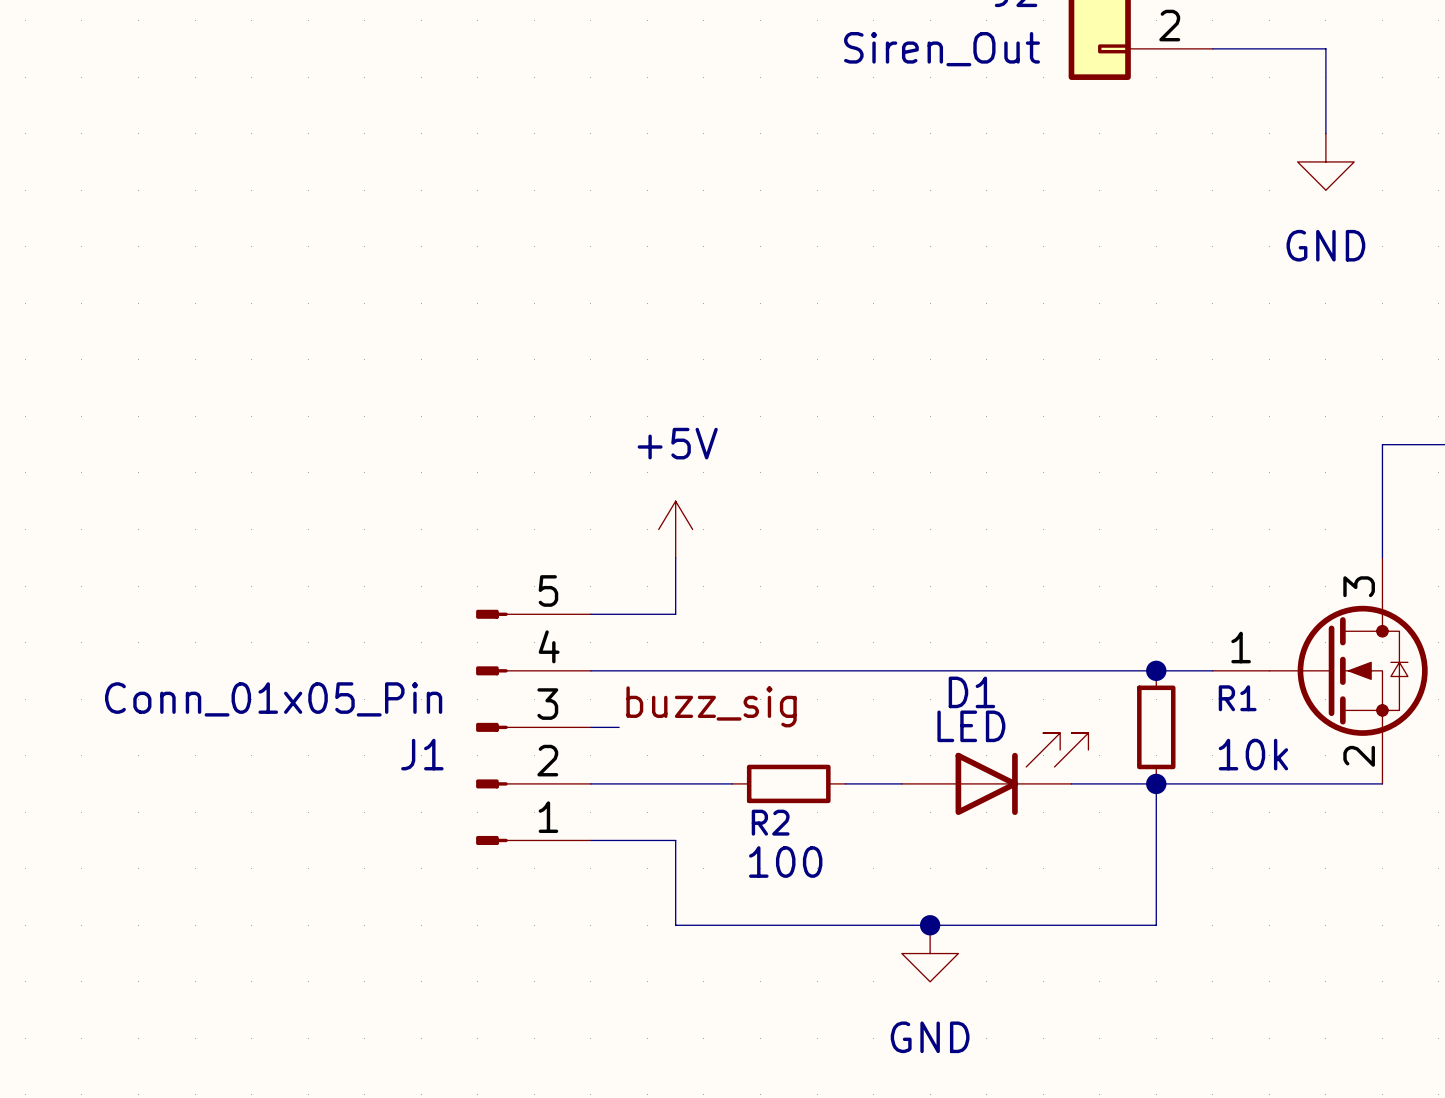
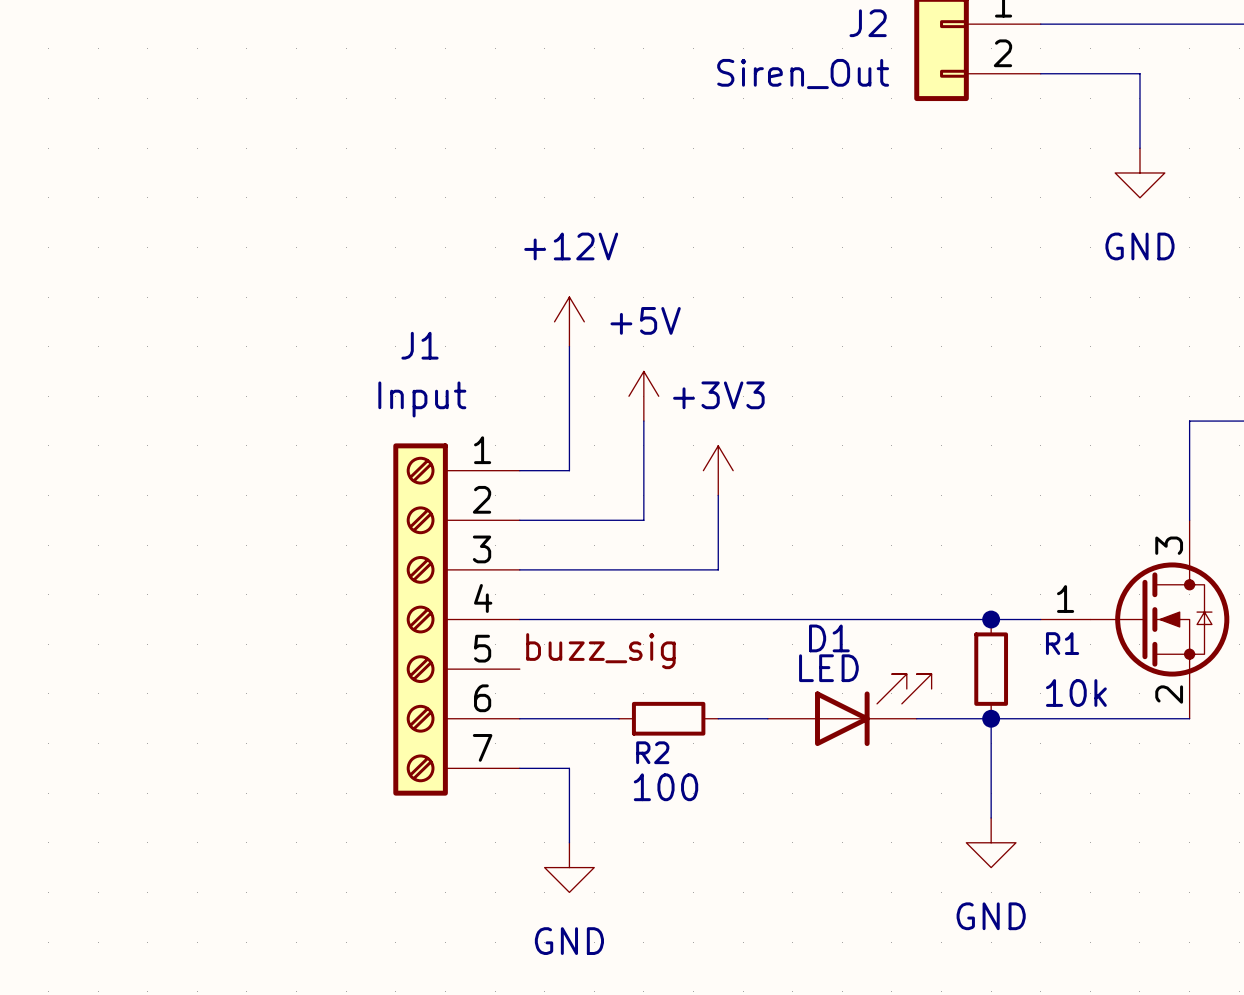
power symbol: none -> +12V (569, 321)
wire: none -> (569, 346) (569, 470) (519, 470)
wire: none -> (643, 421) (643, 520) (519, 520)
power symbol: none -> +3V3 (718, 470)
power symbol position: +5V (675, 529) -> +5V (643, 396)
wire: (675, 557) (675, 614) -> (718, 495) (718, 569) (569, 569)
J1 symbol: [476, 609, 591, 845] -> [393, 443, 520, 796]
J1 value: Conn_01x05_Pin (273, 699) -> Input (422, 399)
J1 name position: J1 (422, 754) -> J1 (419, 345)
wire: (1156, 897) (1156, 925) (675, 925) -> none
junction: (930, 925) -> none
power symbol: none -> GND (991, 842)
power symbol: none -> GND (569, 867)
power symbol: GND (930, 953) -> none

